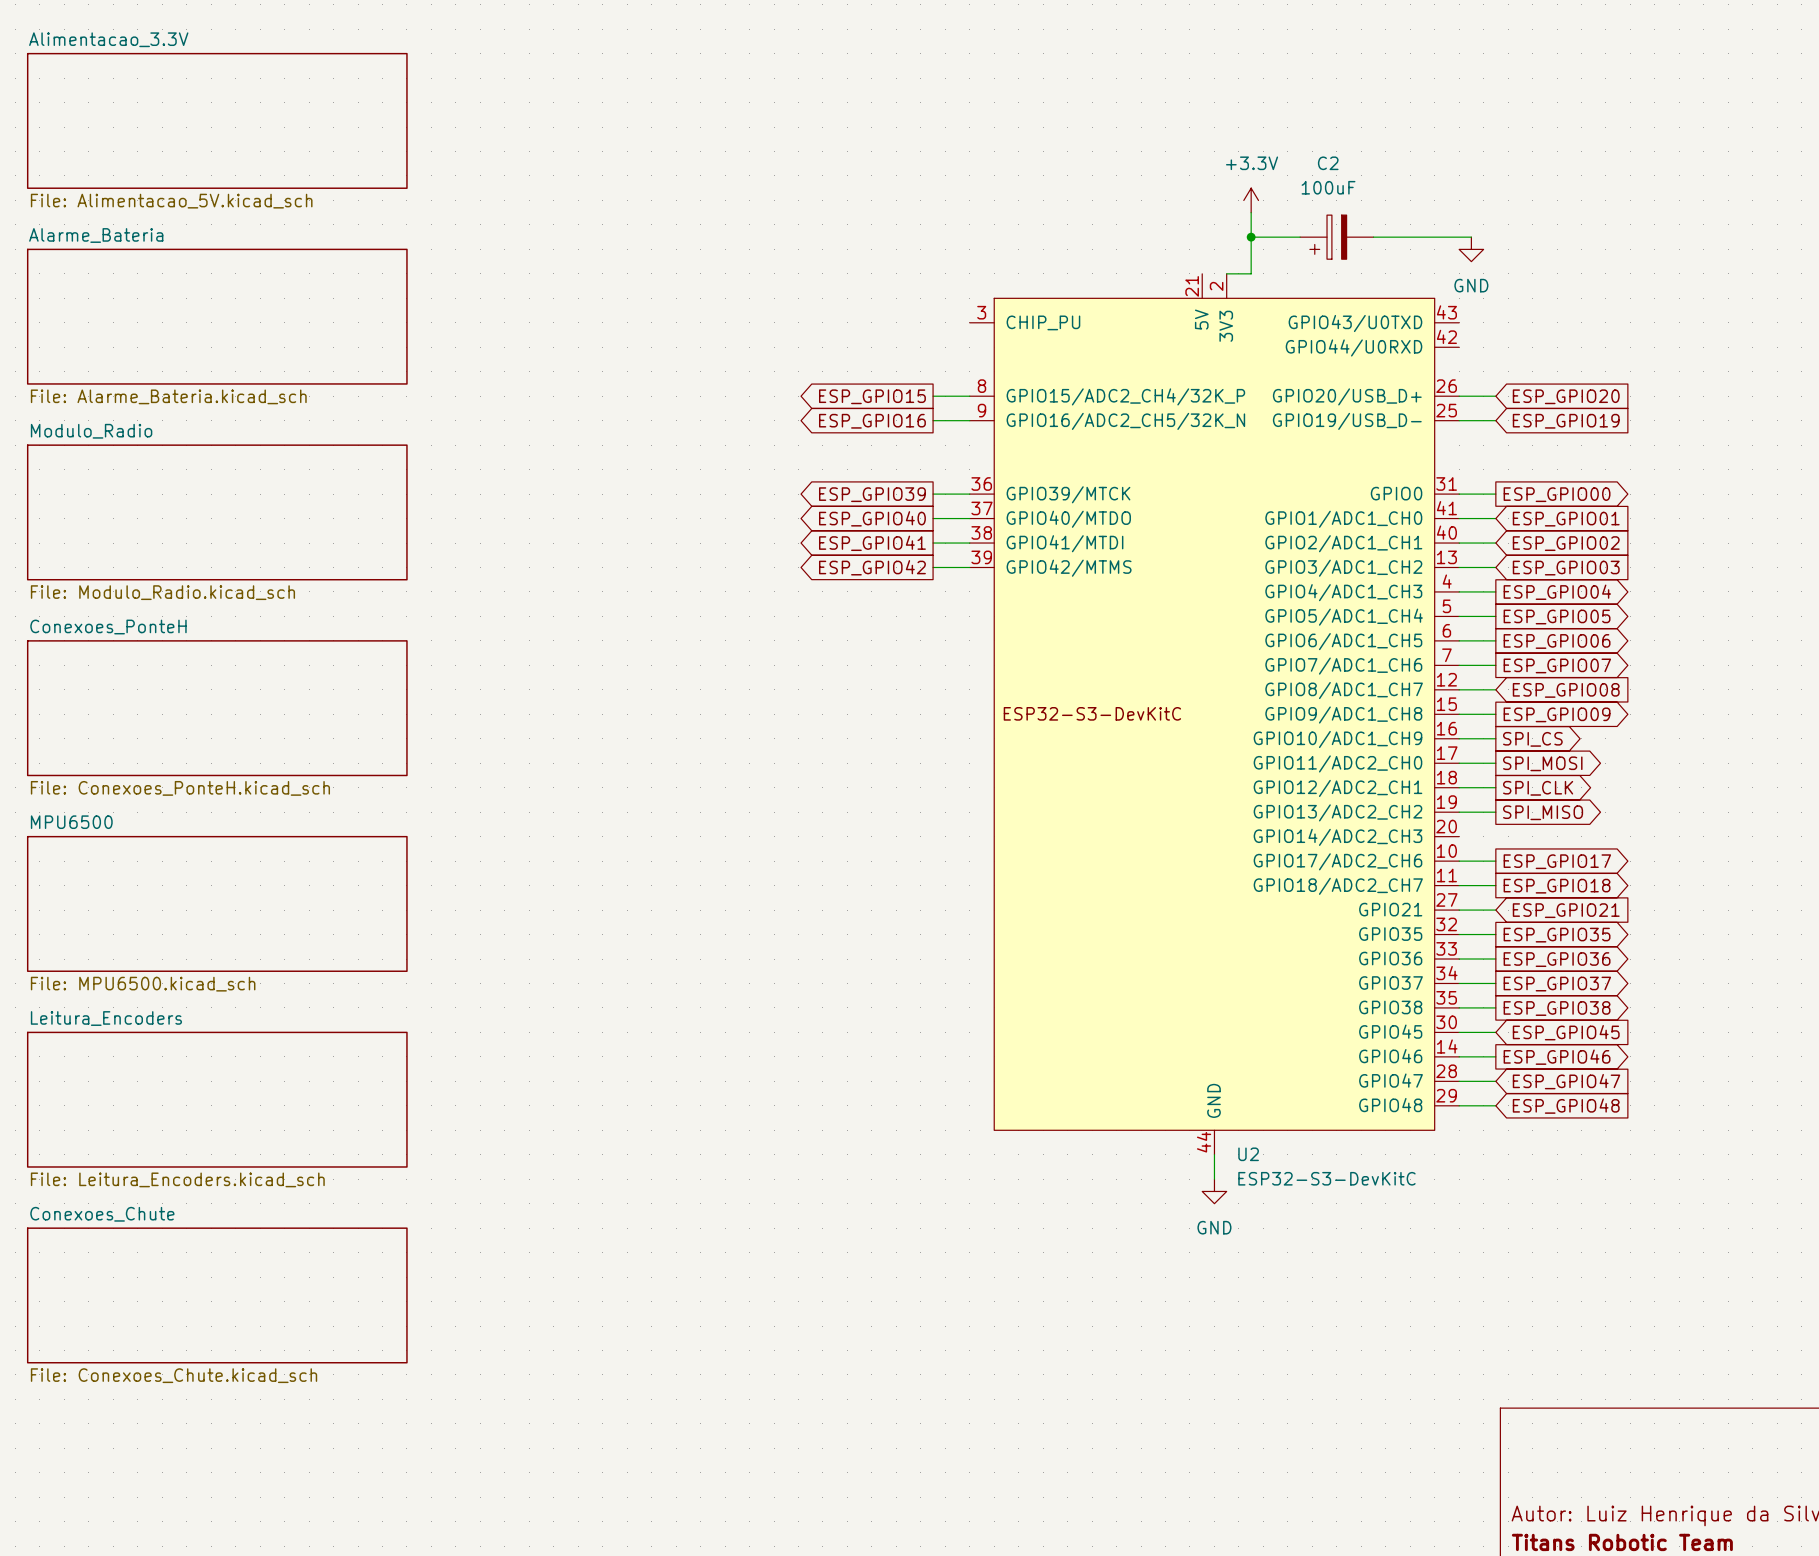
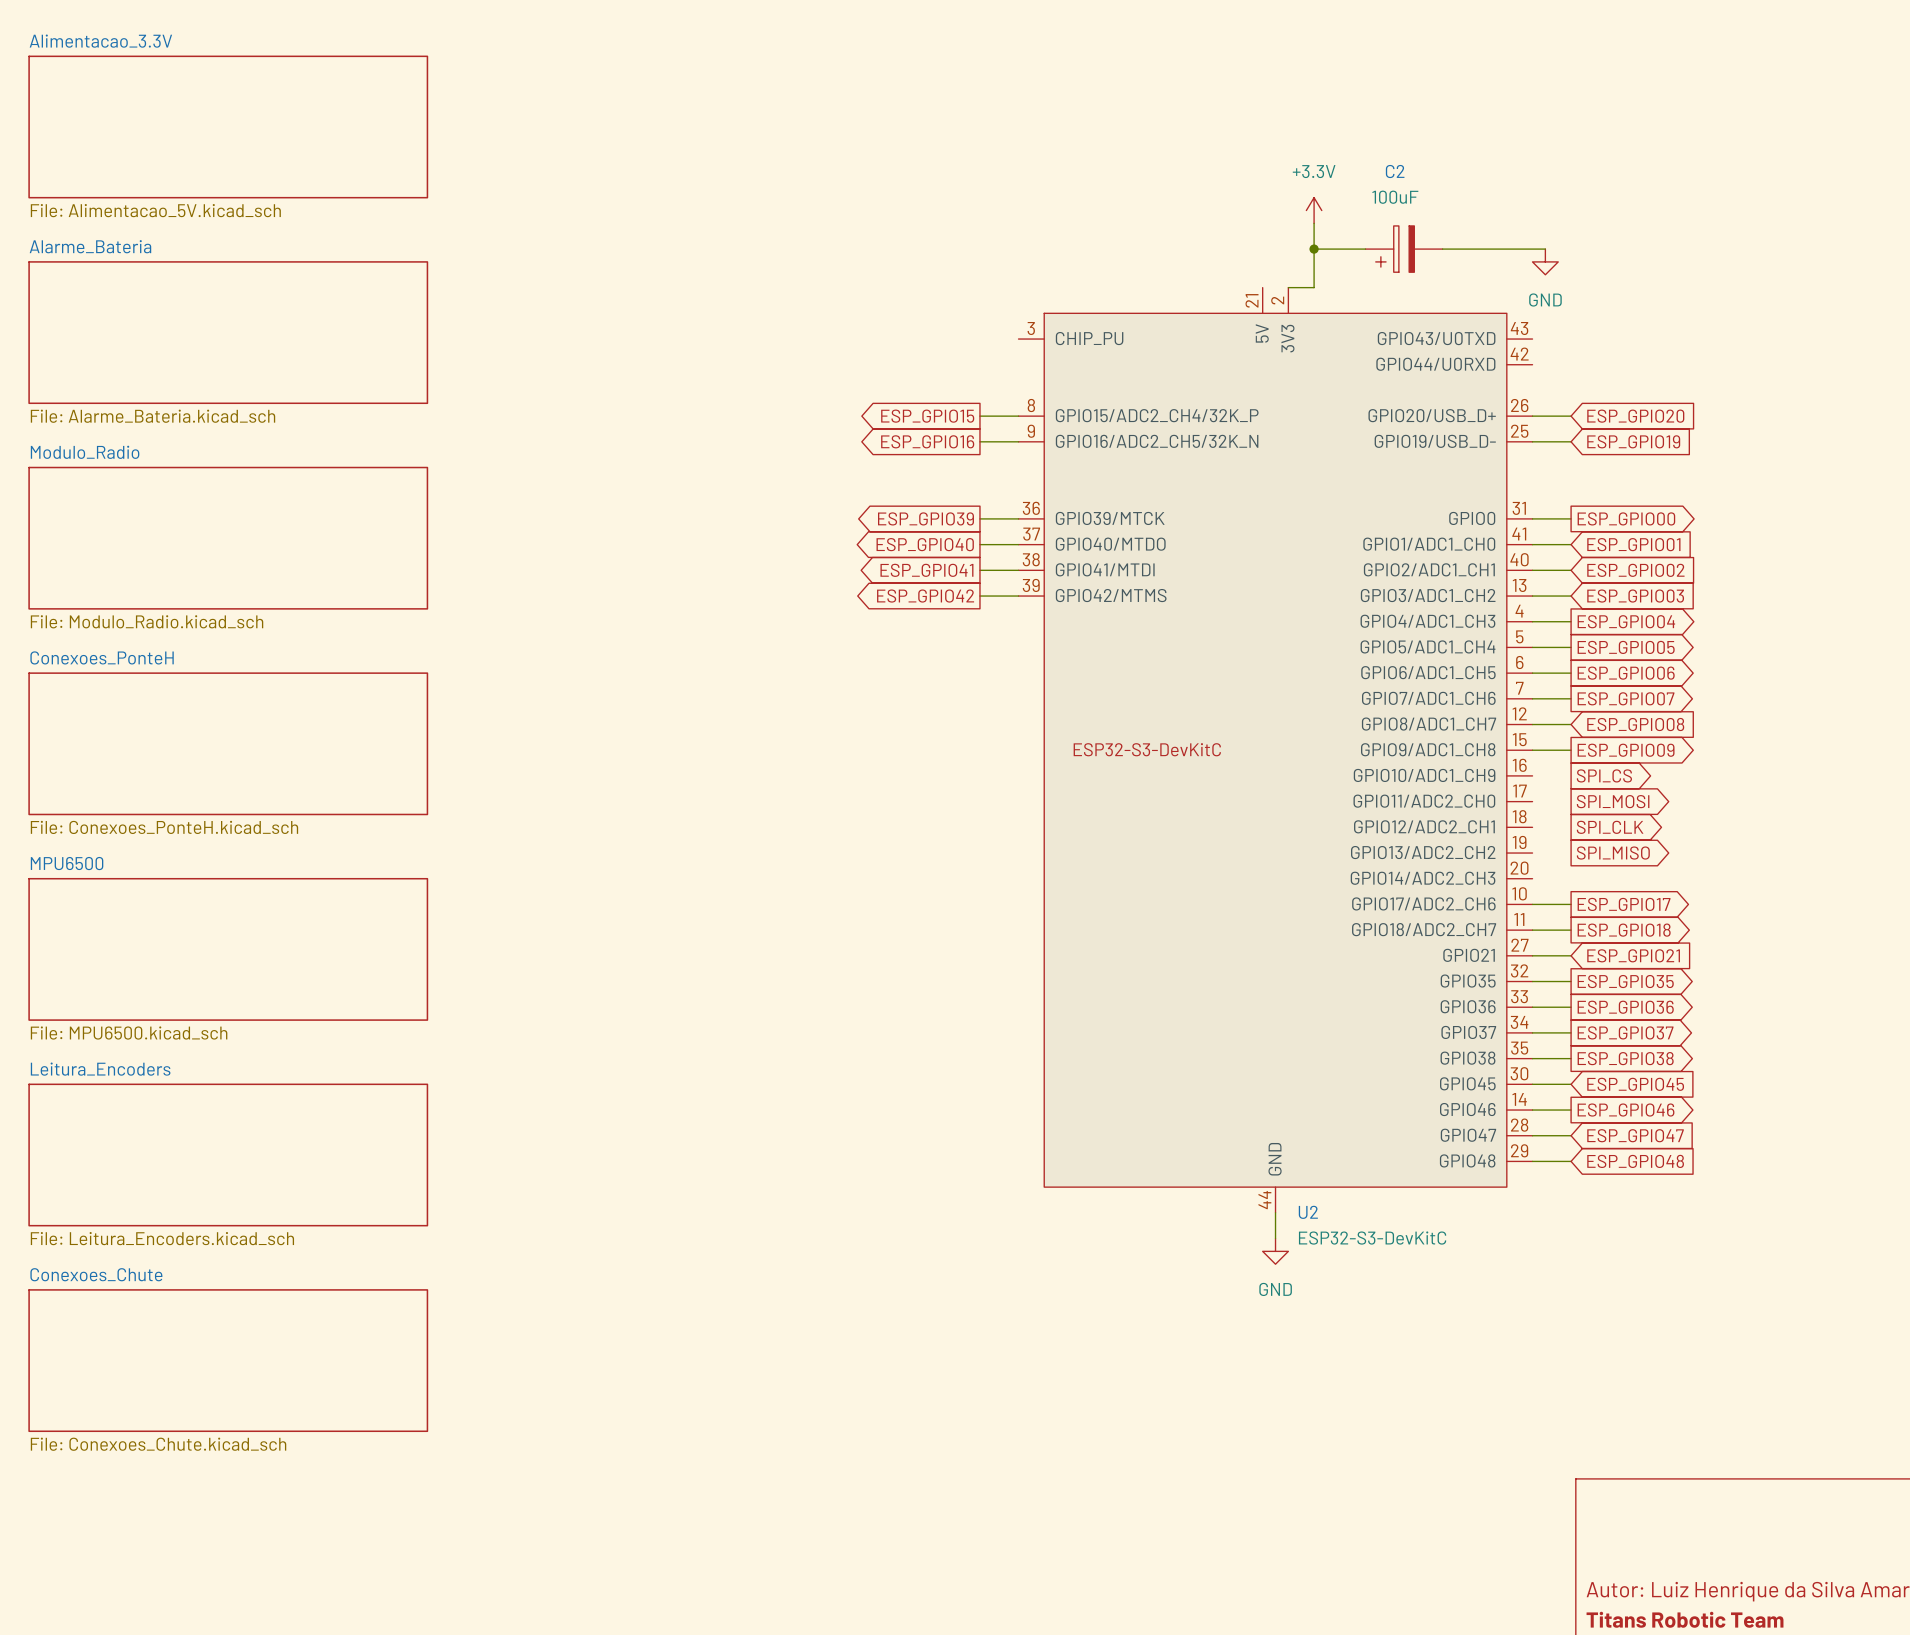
wire: (1459, 738) (1495, 738) -> none
wire: (1459, 763) (1495, 763) -> none
wire: (1459, 787) (1495, 787) -> none
wire: (1459, 812) (1495, 812) -> none

